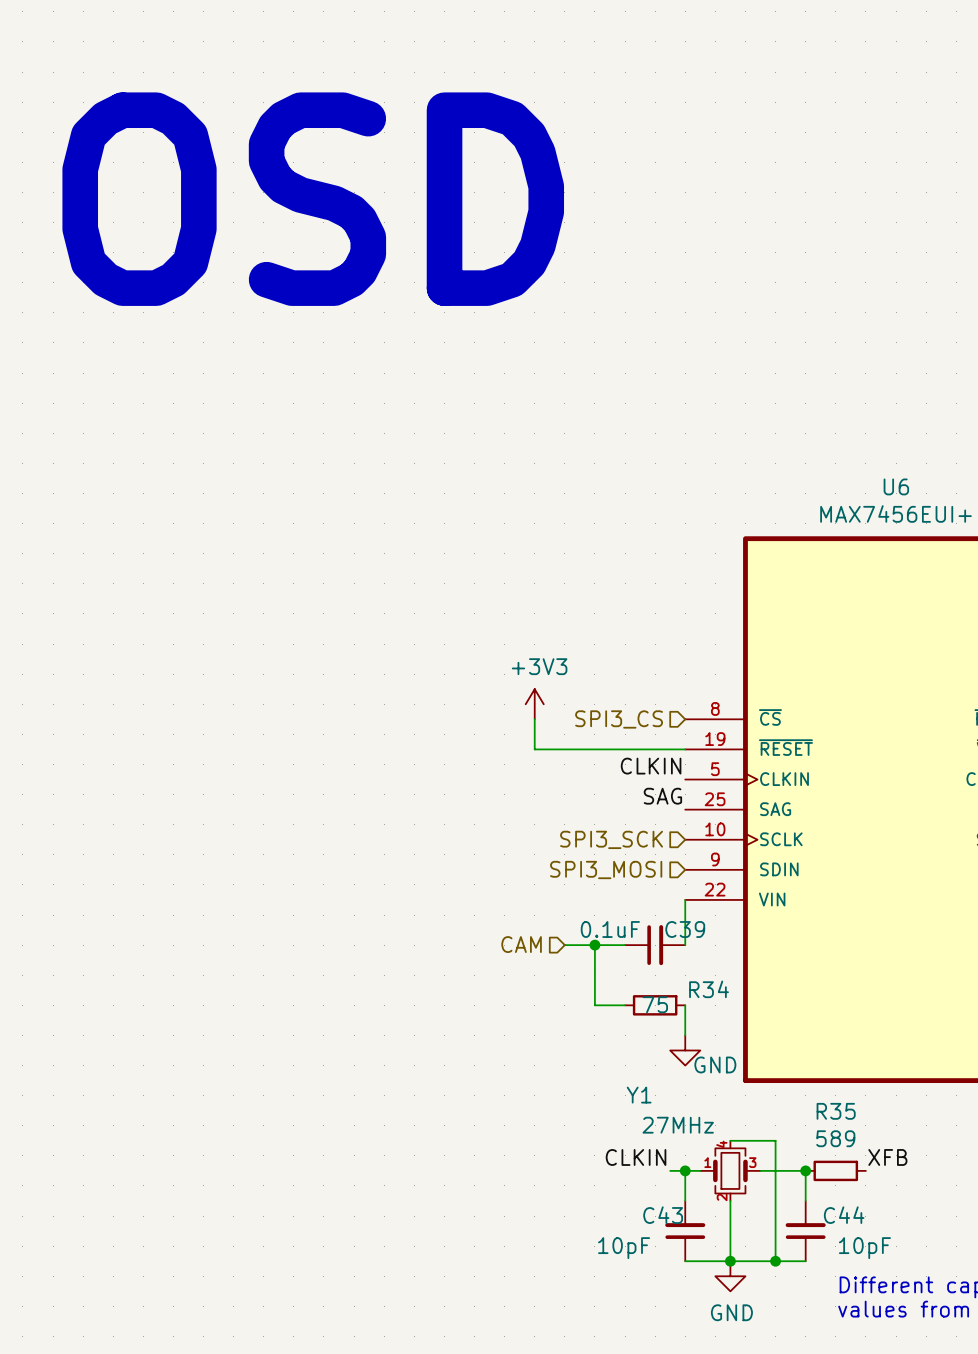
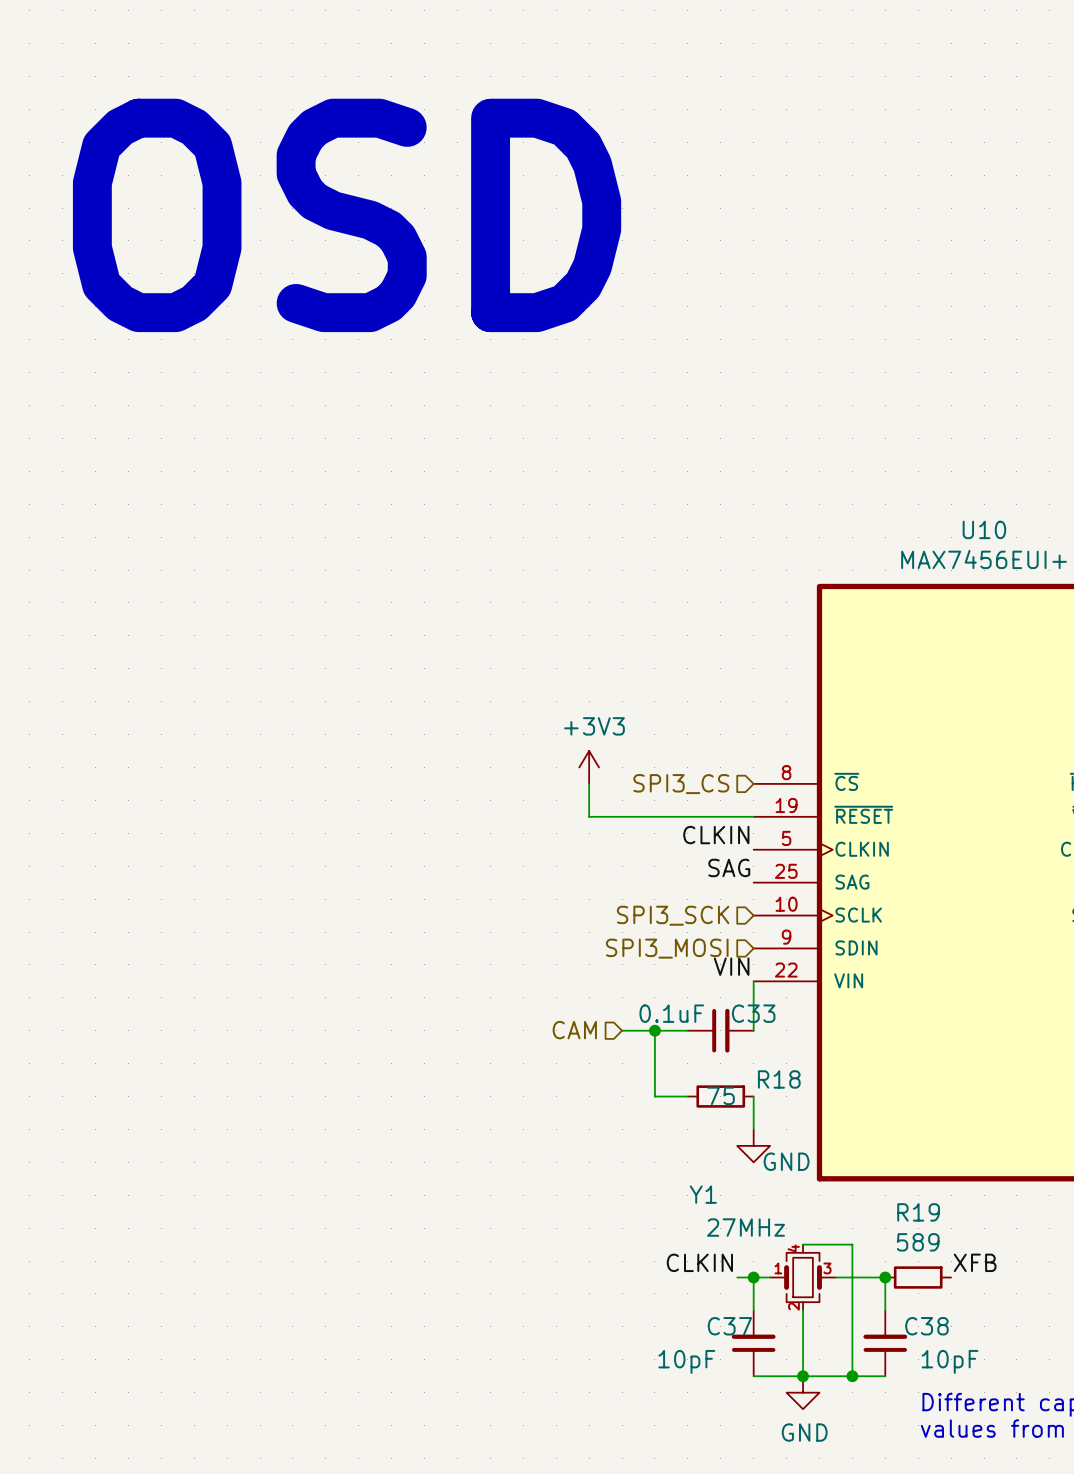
U6 name: U6 (896, 486) -> U10 (984, 529)
label: none -> VIN (731, 966)
C39 name: C39 (685, 929) -> C33 (753, 1013)
R34 name: R34 (709, 989) -> R18 (779, 1079)
R35 name: R35 (836, 1111) -> R19 (918, 1212)
C43 name: C43 (663, 1215) -> C37 (729, 1326)
C44 name: C44 (844, 1215) -> C38 (926, 1326)

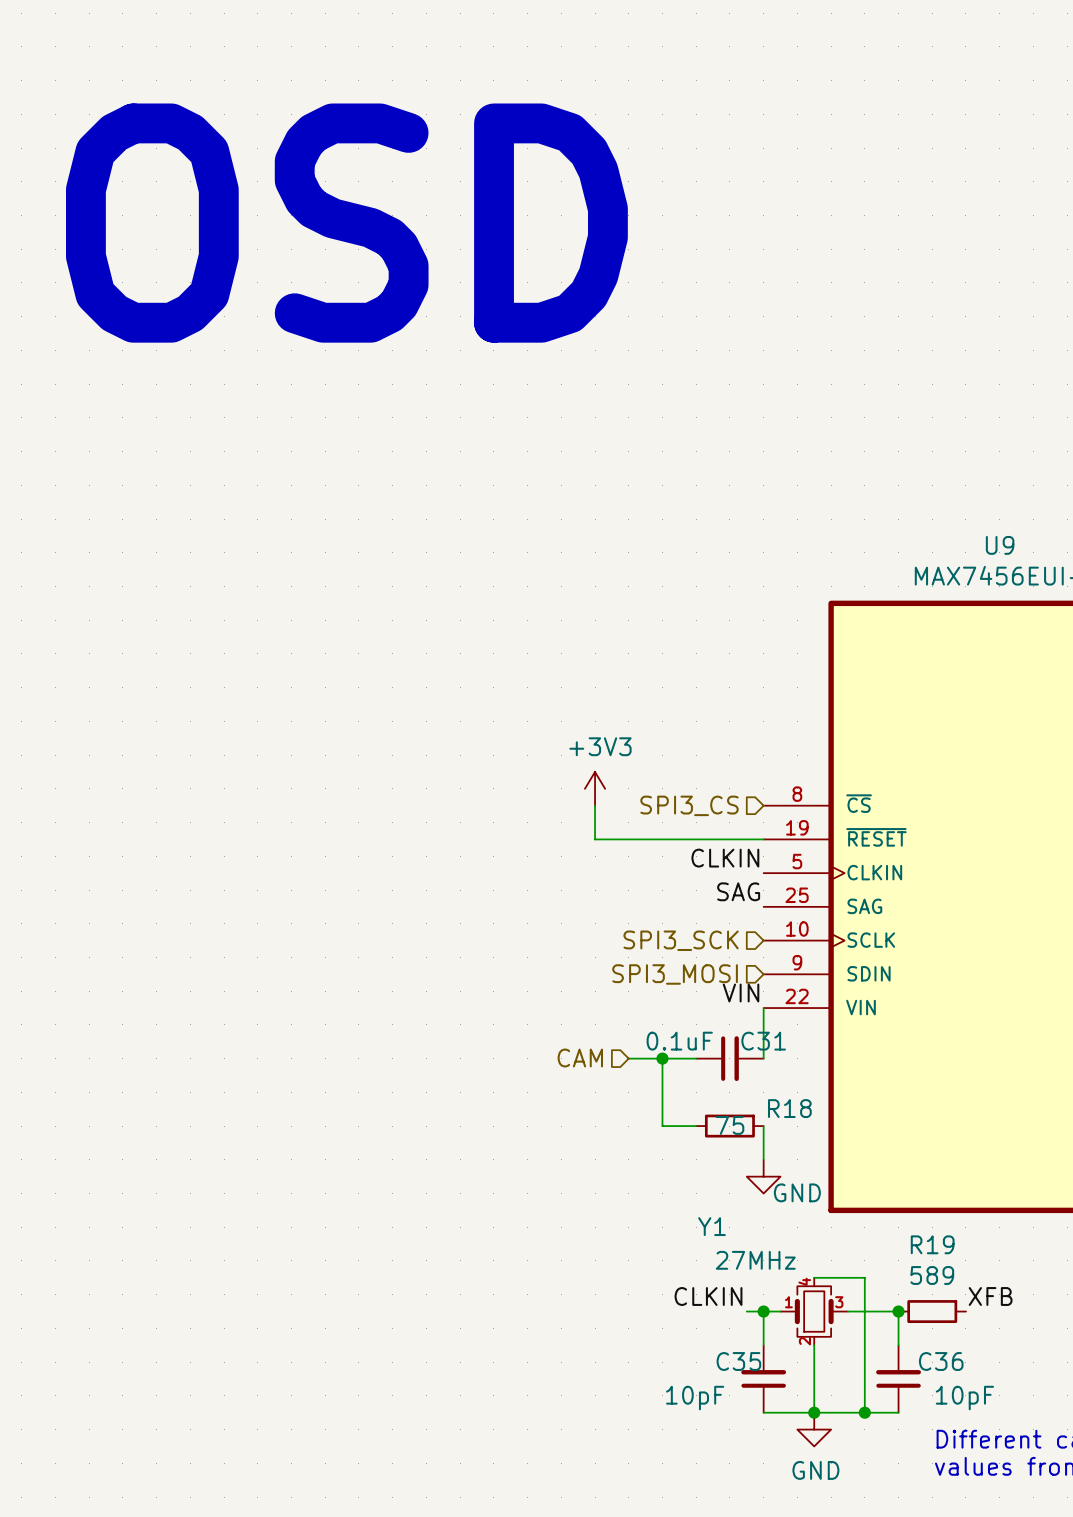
U10 name: U10 (984, 529) -> U9 (1000, 545)
C33 name: C33 (753, 1013) -> C31 (763, 1041)
C37 name: C37 (729, 1326) -> C35 (738, 1361)
C38 name: C38 (926, 1326) -> C36 (941, 1361)

